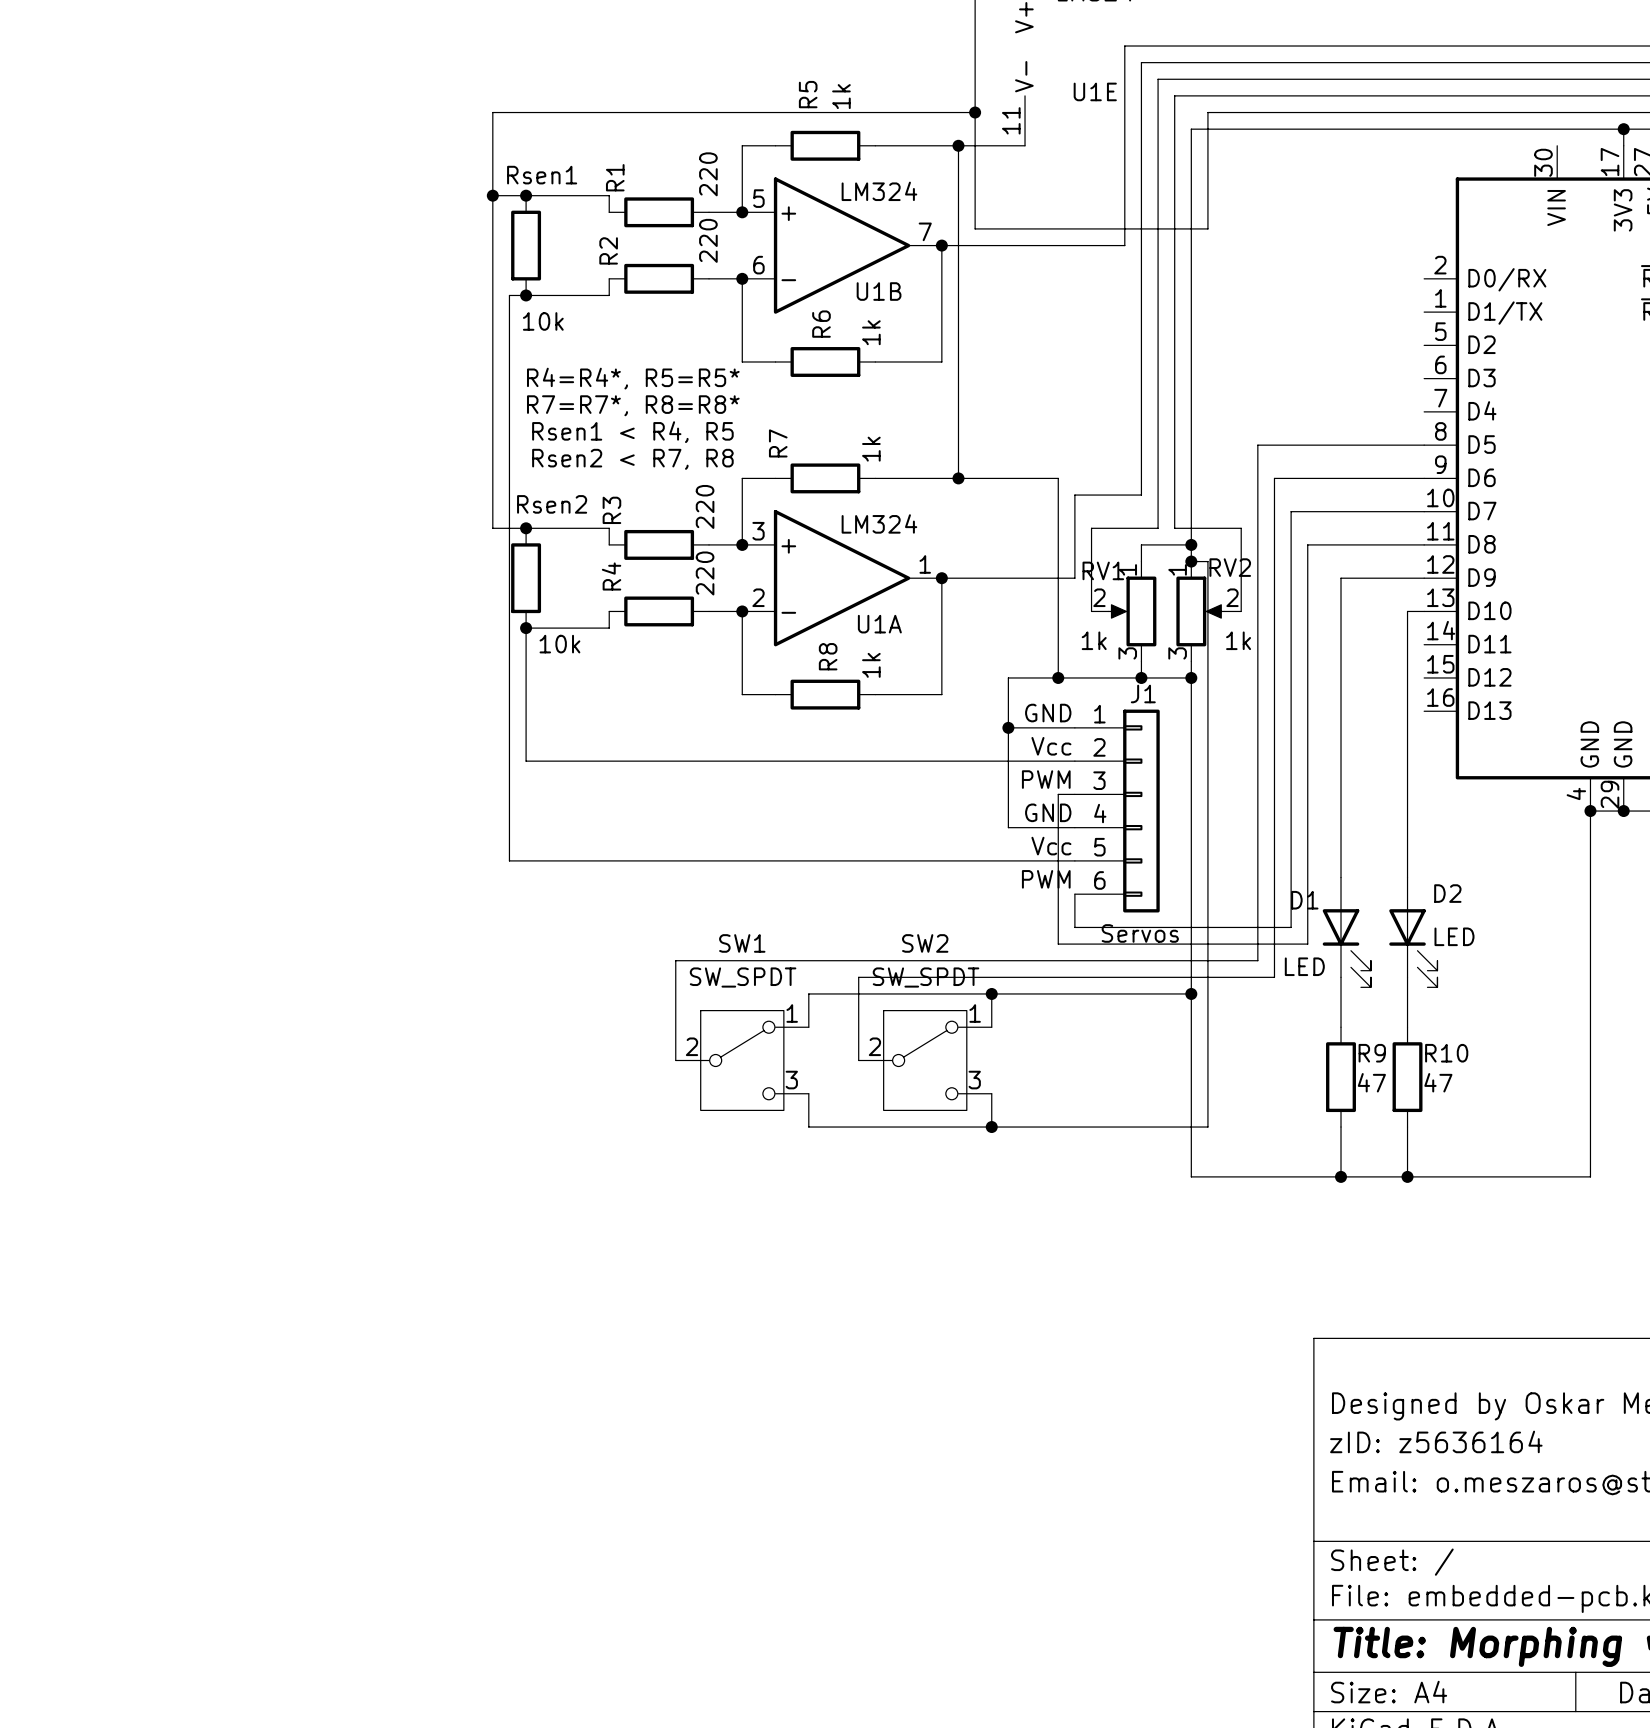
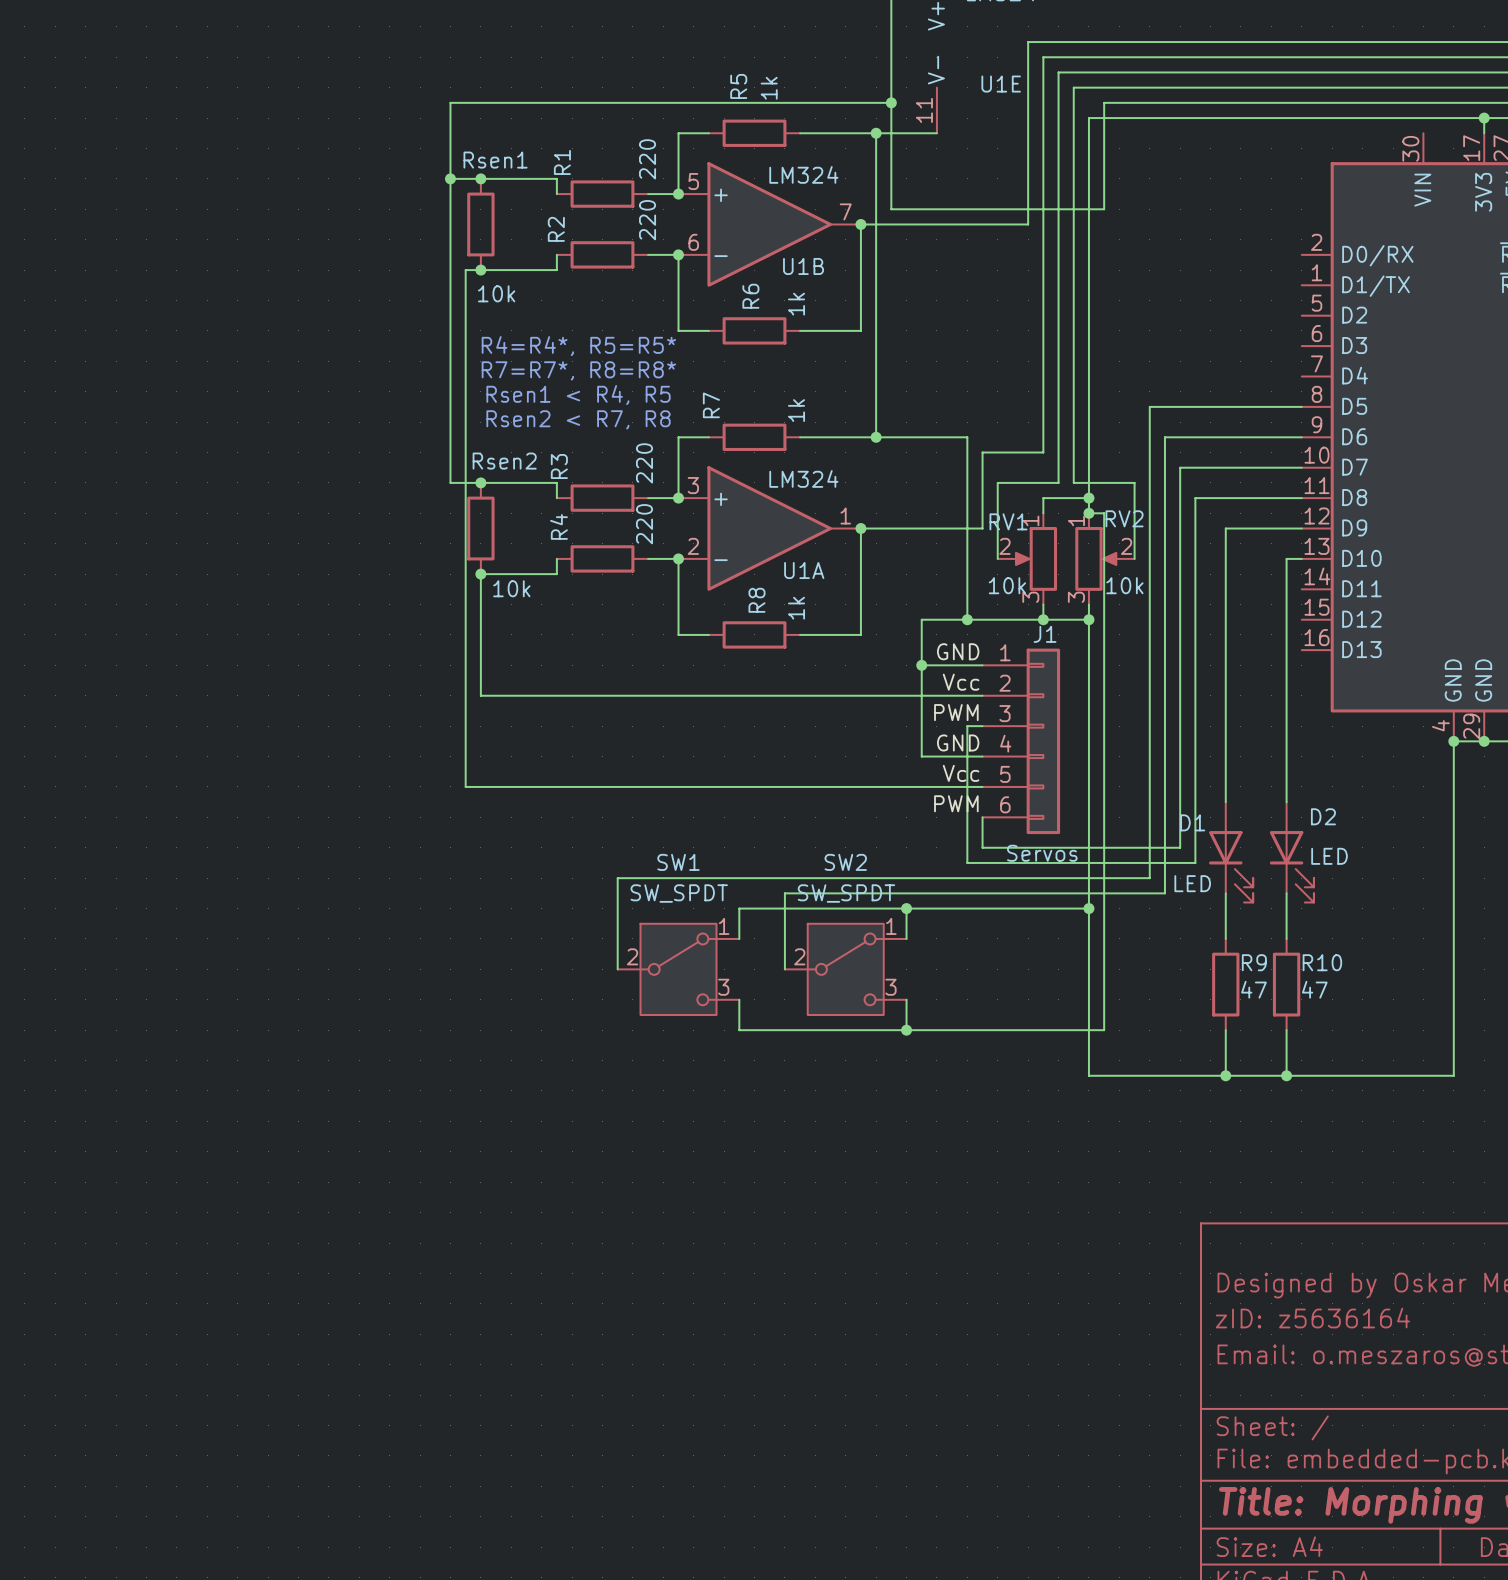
RV1 value: 1k (1094, 640) -> 10k (1007, 585)
RV2 value: 1k (1238, 640) -> 10k (1124, 585)

